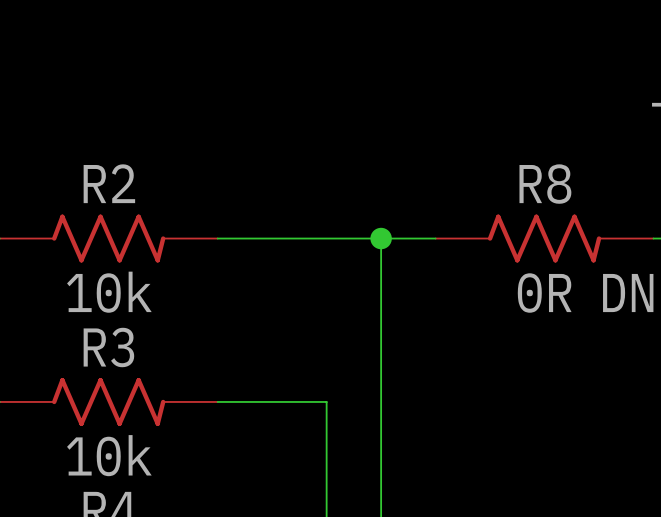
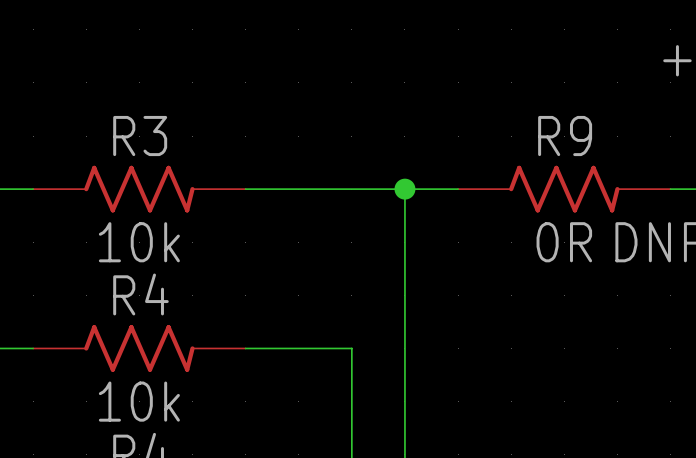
R2 name: R2 (109, 183) -> R3 (140, 136)
R8 name: R8 (545, 184) -> R9 (565, 136)
R3 name: R3 (108, 347) -> R4 (140, 294)

